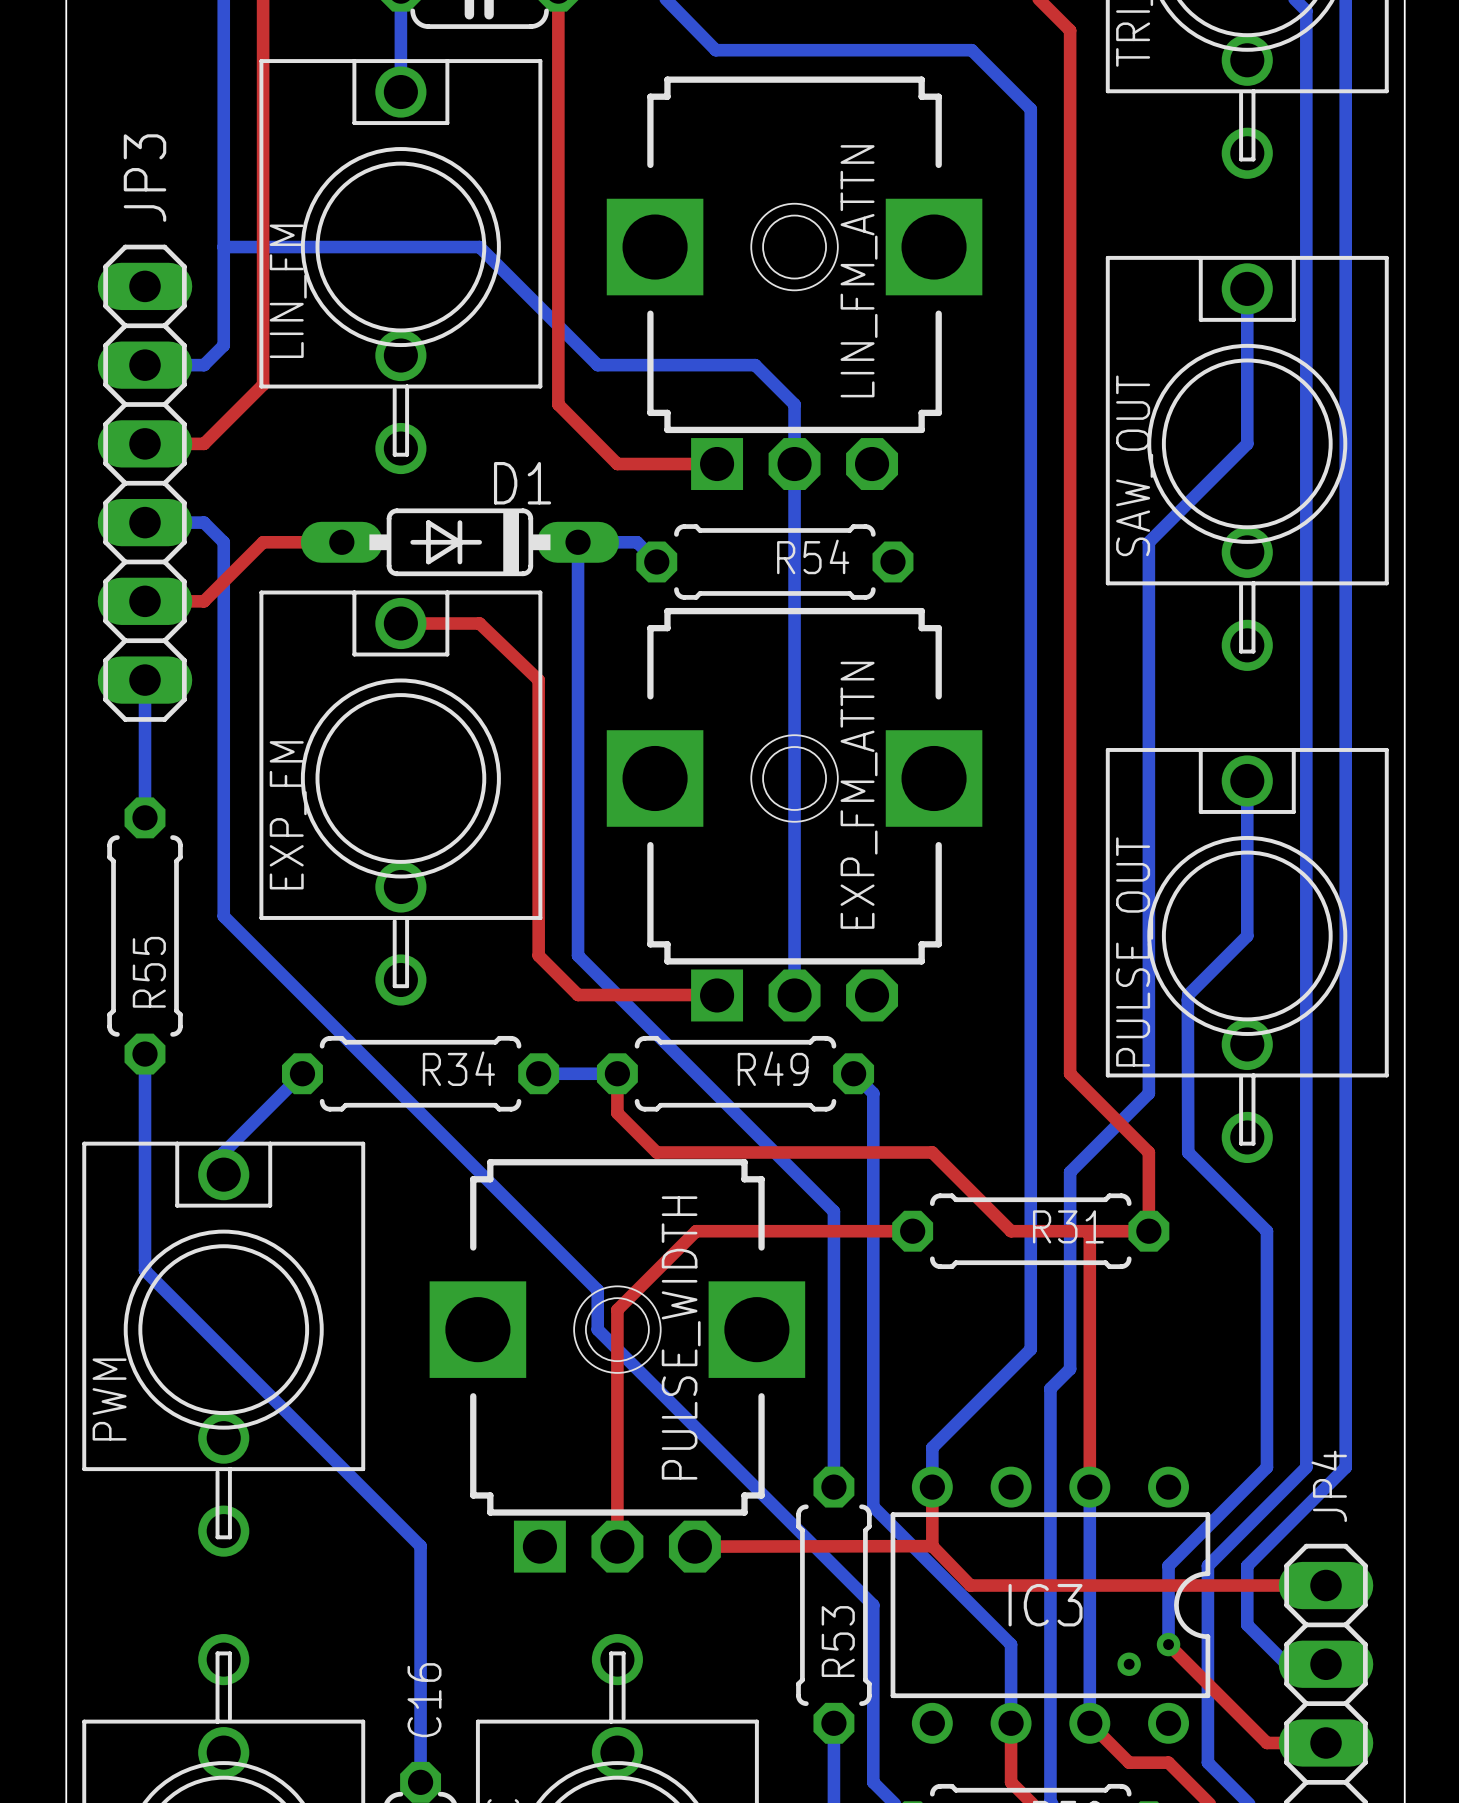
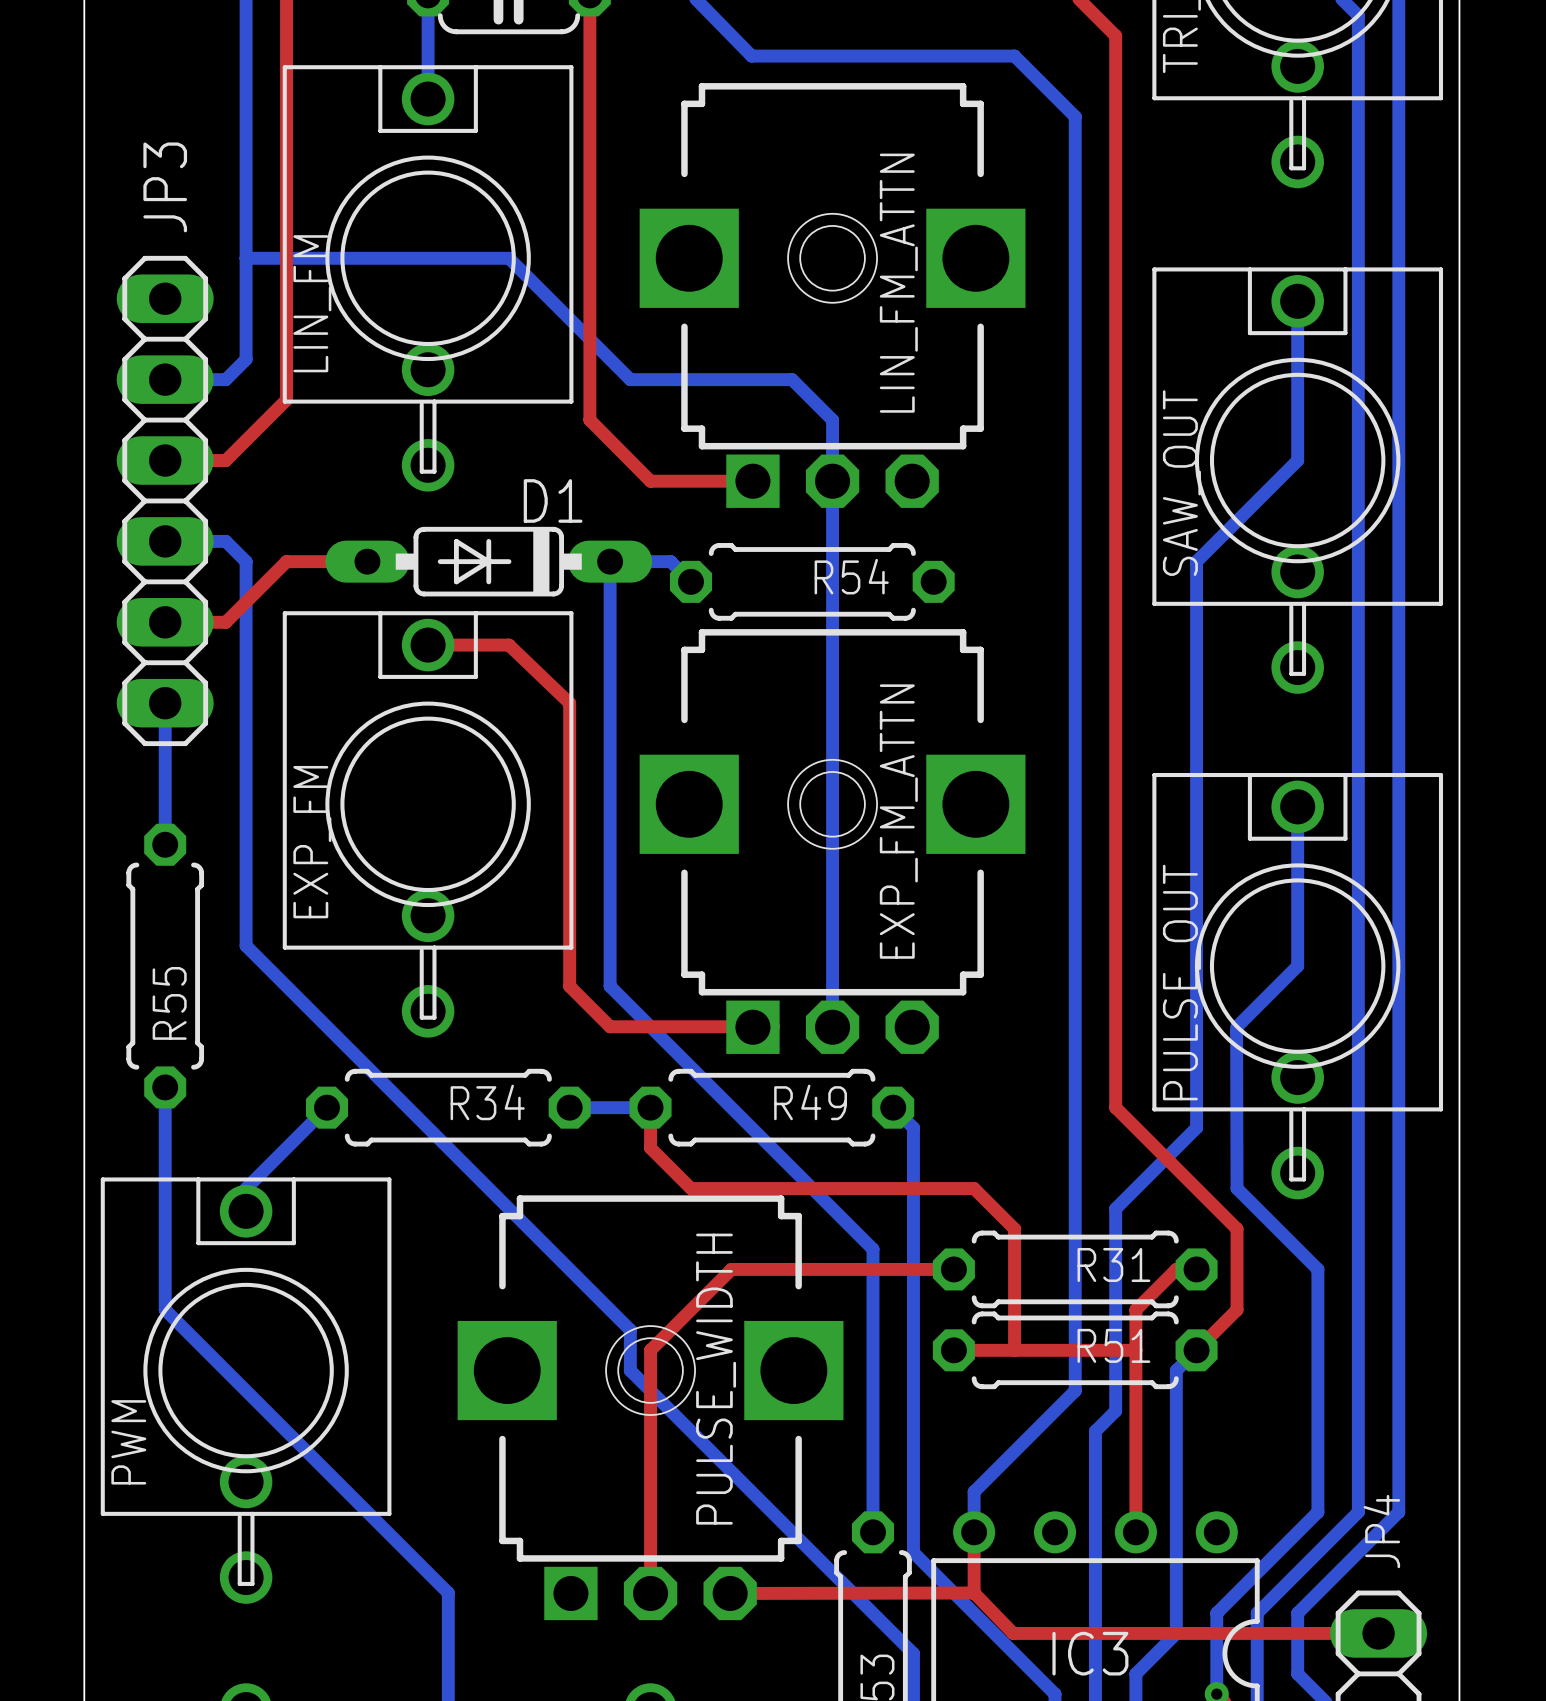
top track: (1148, 1152) (1148, 1231) -> (1196, 1188) (1237, 1228) (1237, 1309) (1196, 1350)
top track: (971, 1191) (1011, 1231) (1129, 1231) -> (1014, 1228) (1014, 1350)
top track: (1089, 1231) (1089, 1270) -> (1176, 1269) (1135, 1309)
top track: none -> (953, 1350) (1135, 1350)
R51: none -> (1075, 1350)
bottom track: (1089, 1487) (1089, 1624) -> (1196, 1350) (1176, 1370) (1176, 1633) (1135, 1673)

